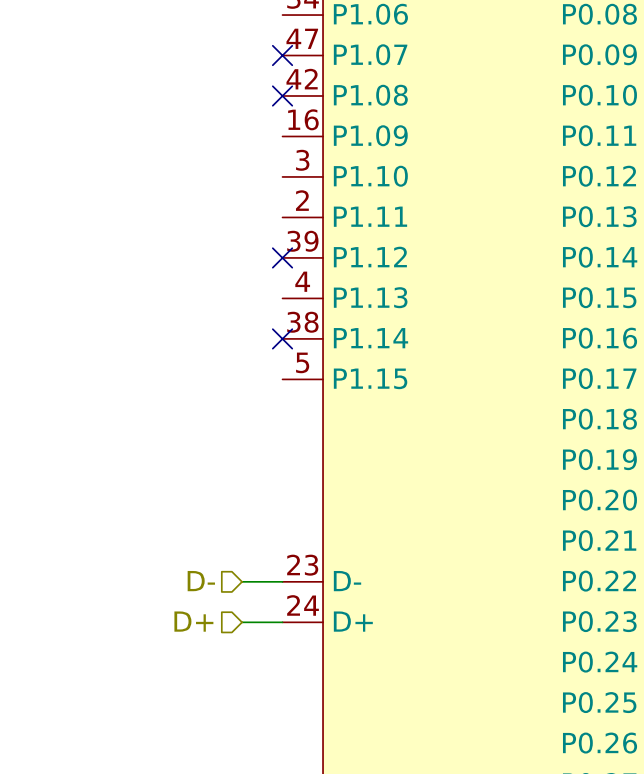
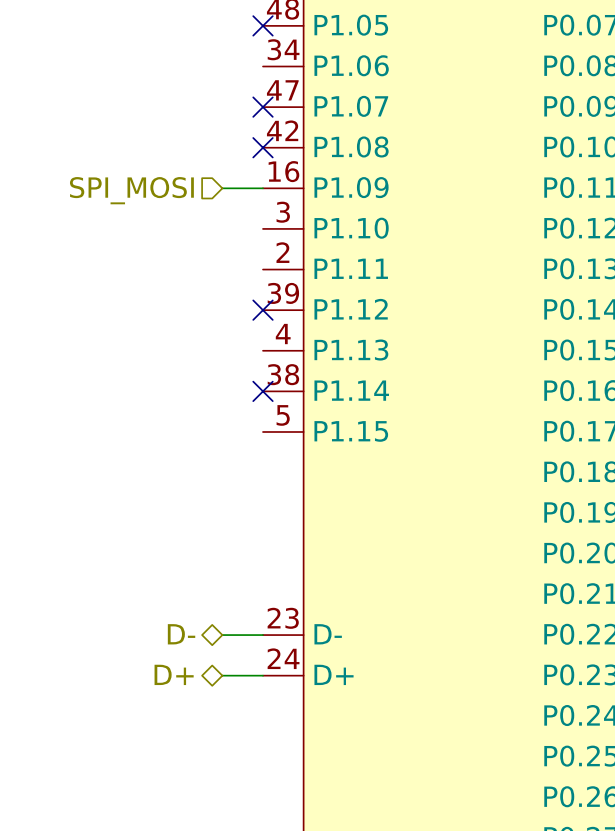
wire: none -> (222, 188) (263, 188)
hierarchical label: none -> SPI_MOSI (131, 190)
hierarchical label shape: input (201, 581) -> bidirectional (181, 634)
hierarchical label shape: input (193, 621) -> bidirectional (174, 674)

